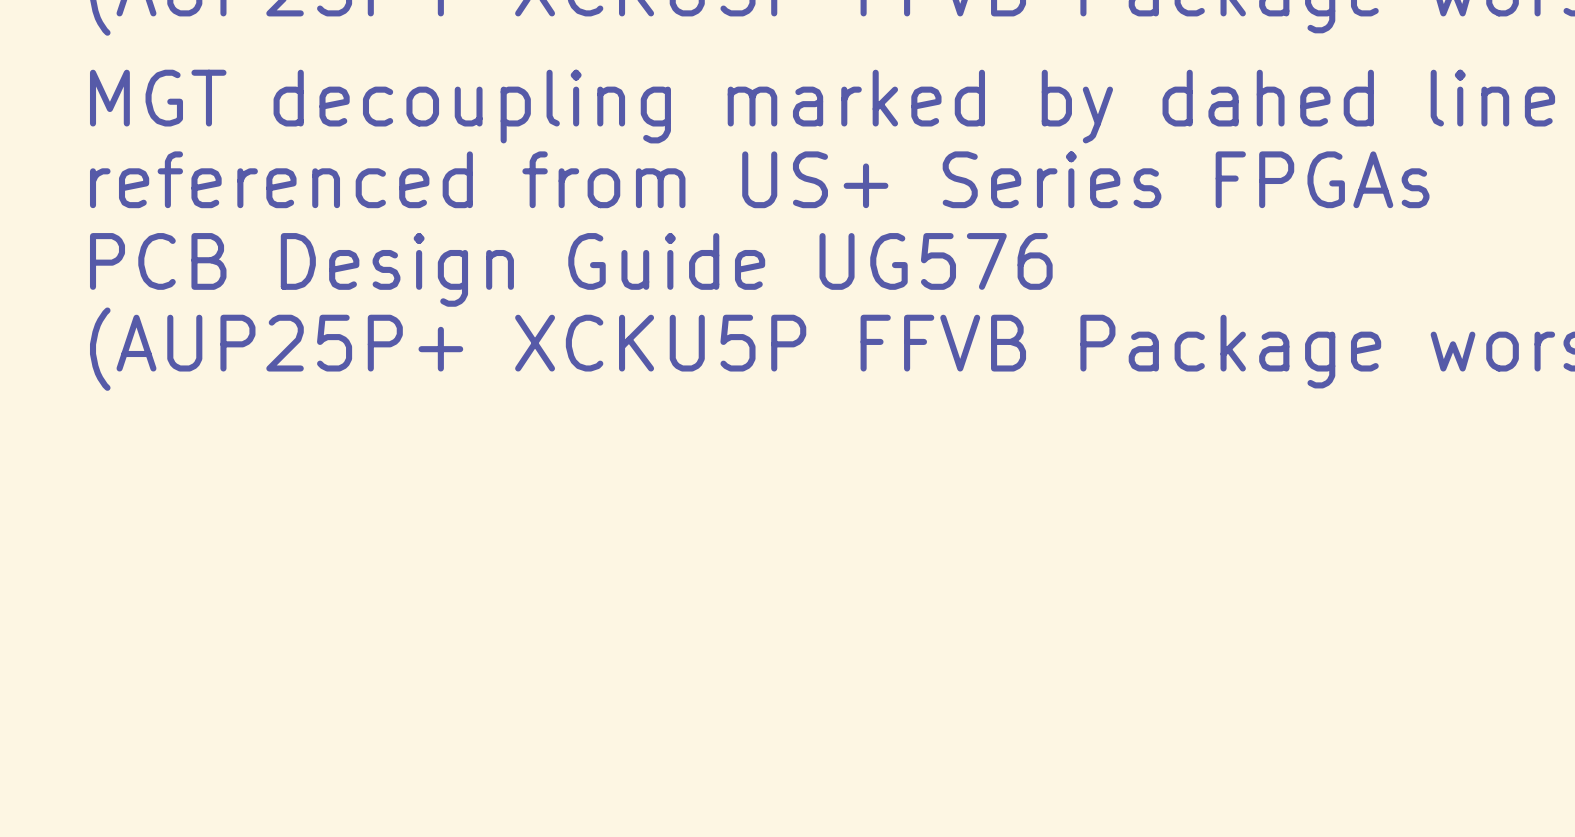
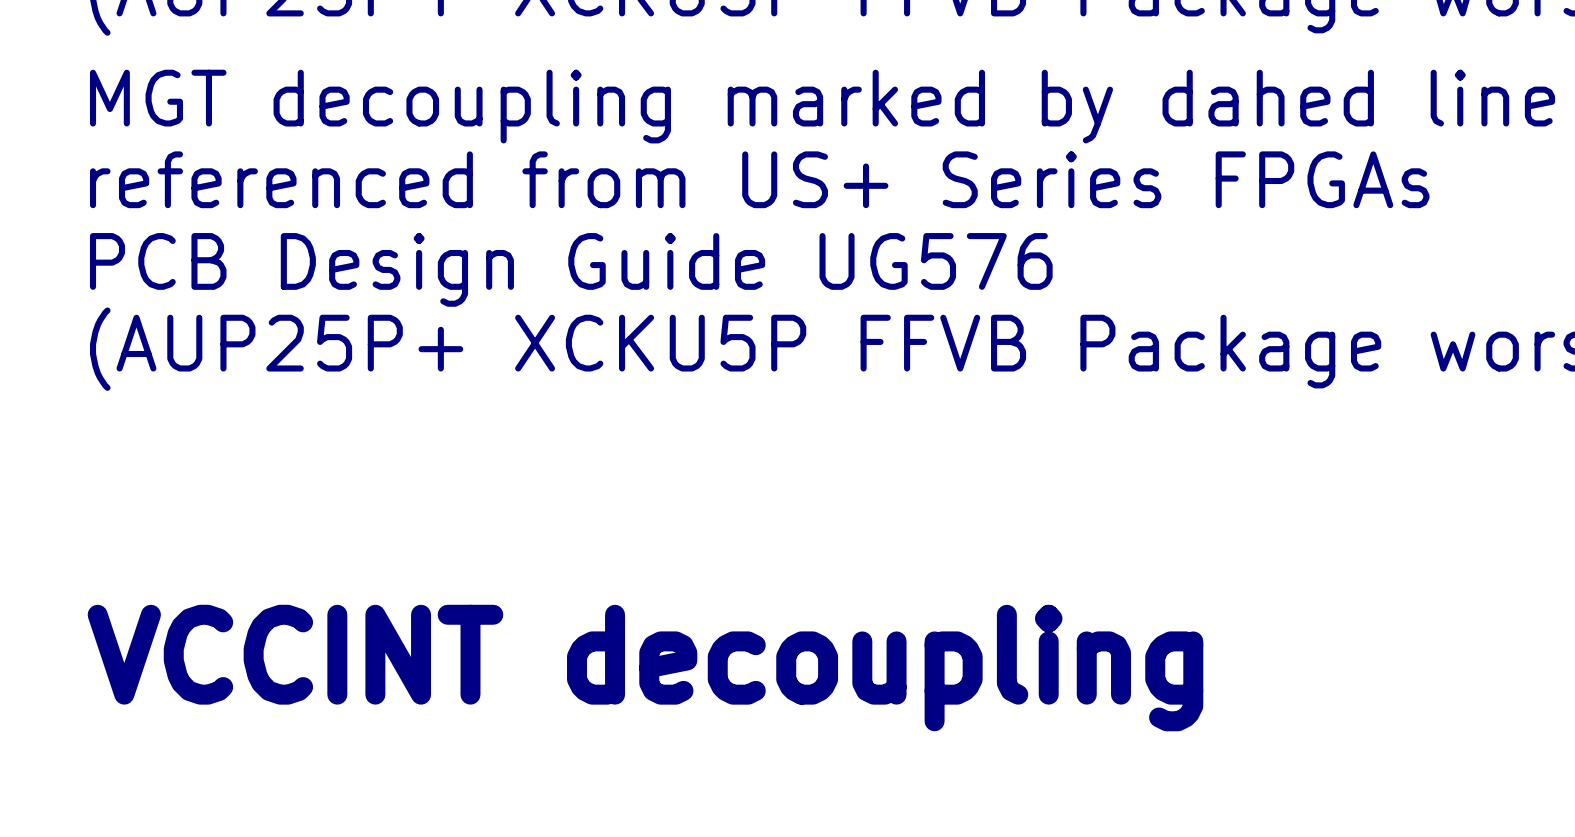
text: none -> VCCINT decoupling (645, 668)

